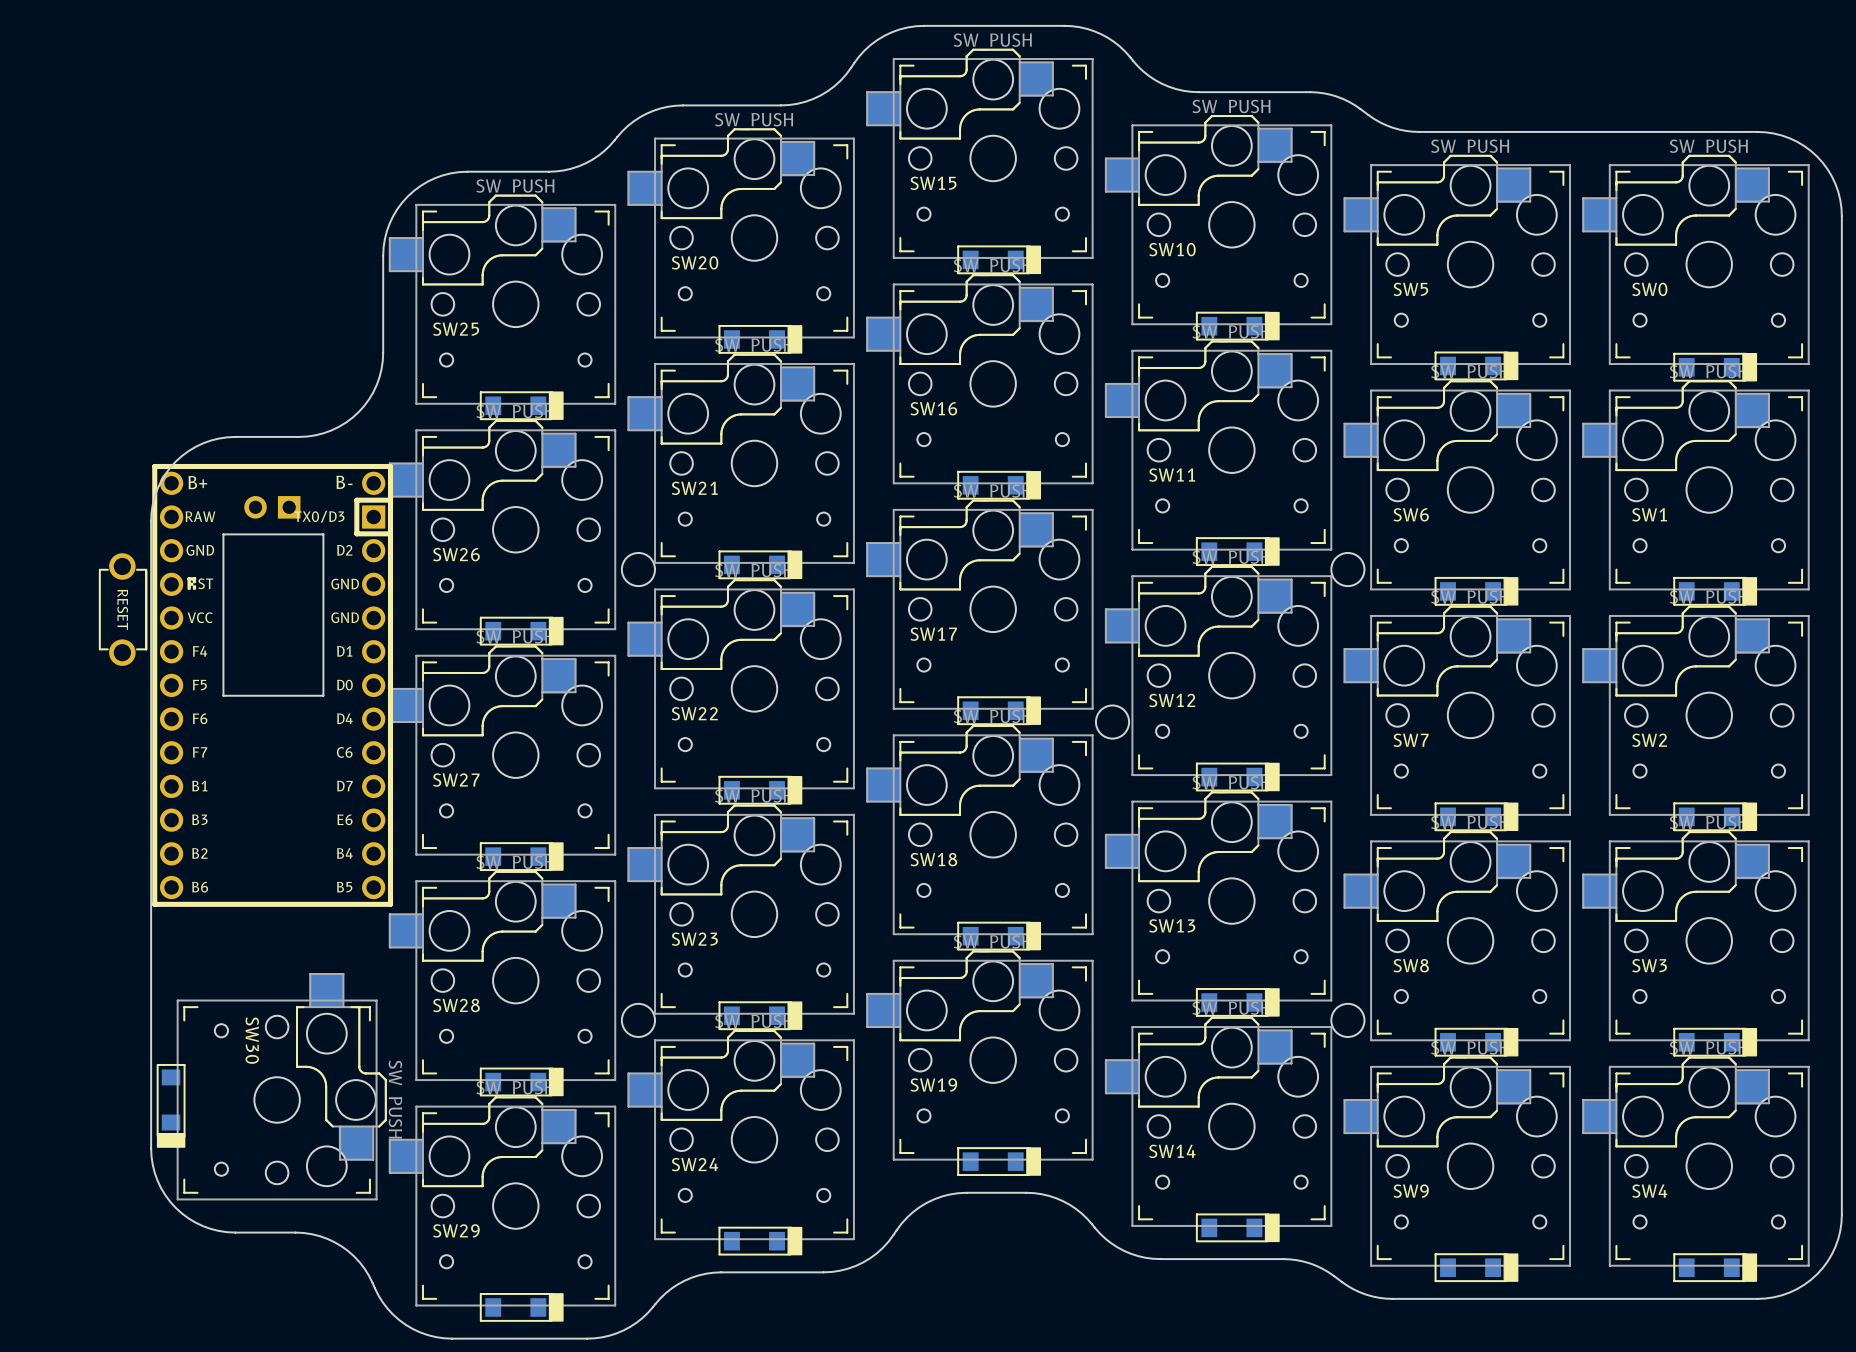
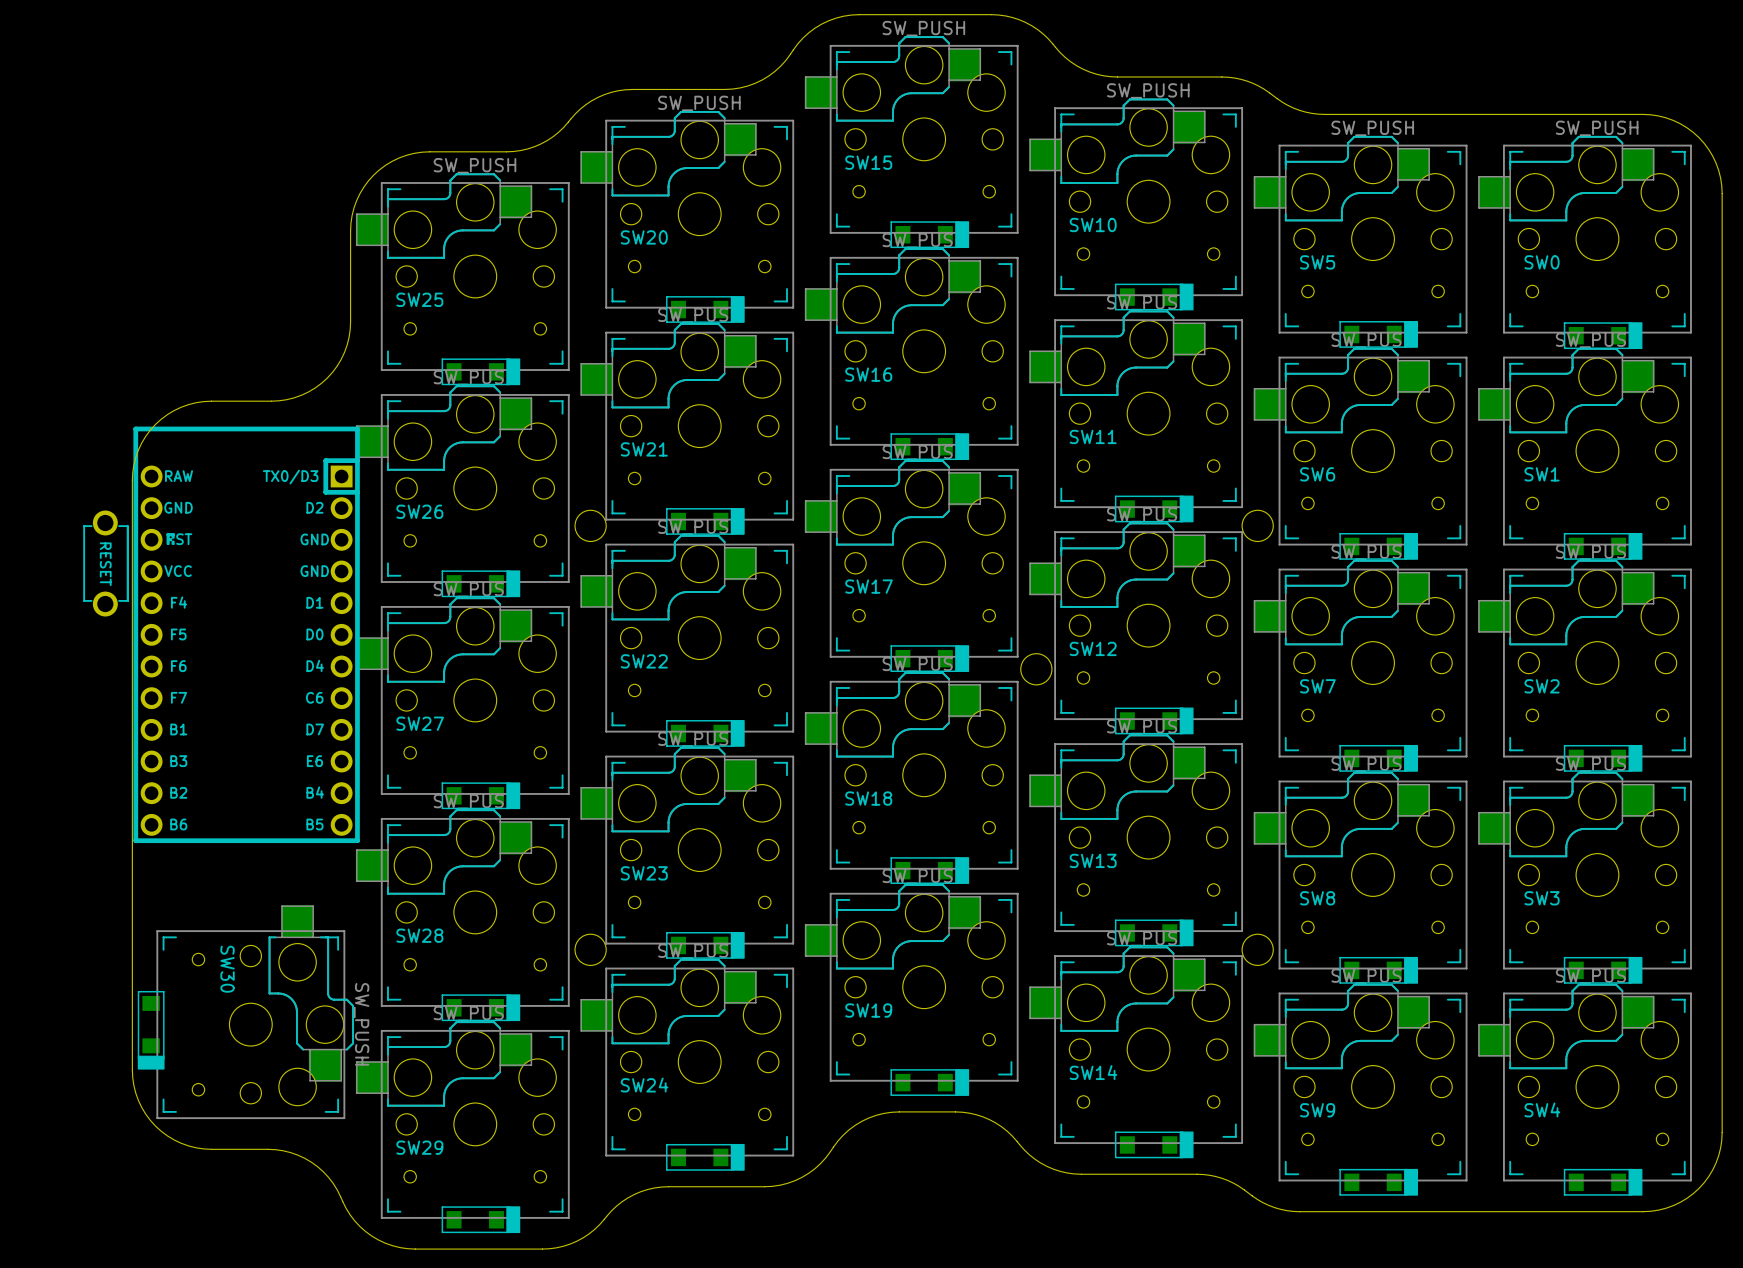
part footprint: [152, 463, 394, 907] -> [133, 426, 360, 844]
part: (272, 507) -> none
board edge: (323, 534) (323, 695) (223, 695) (223, 534) (323, 534) -> none

